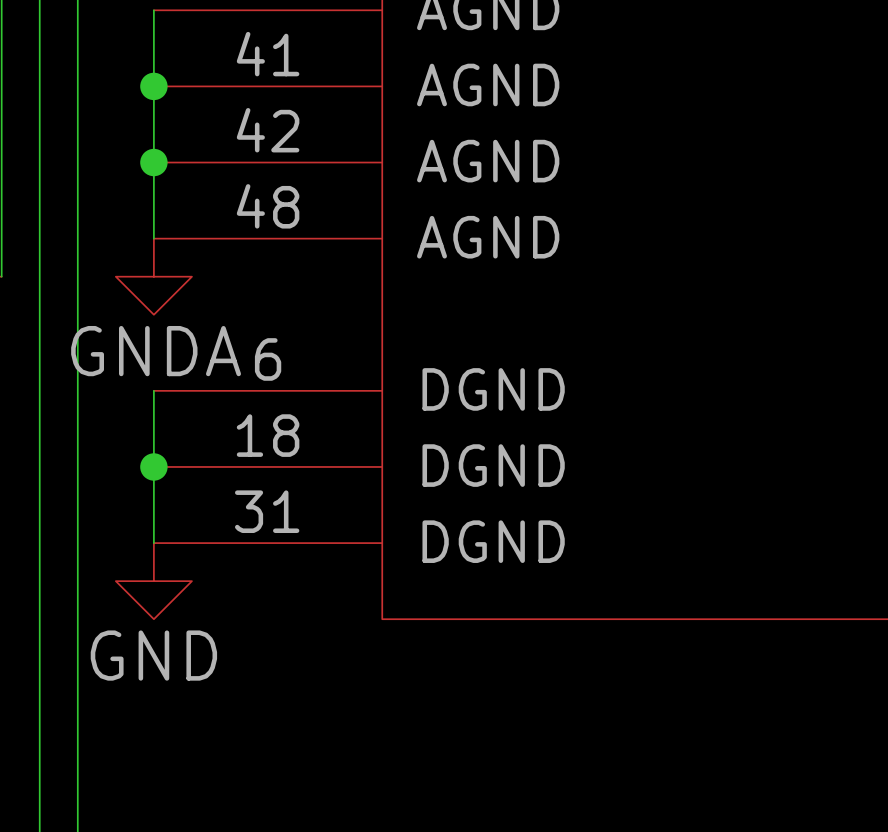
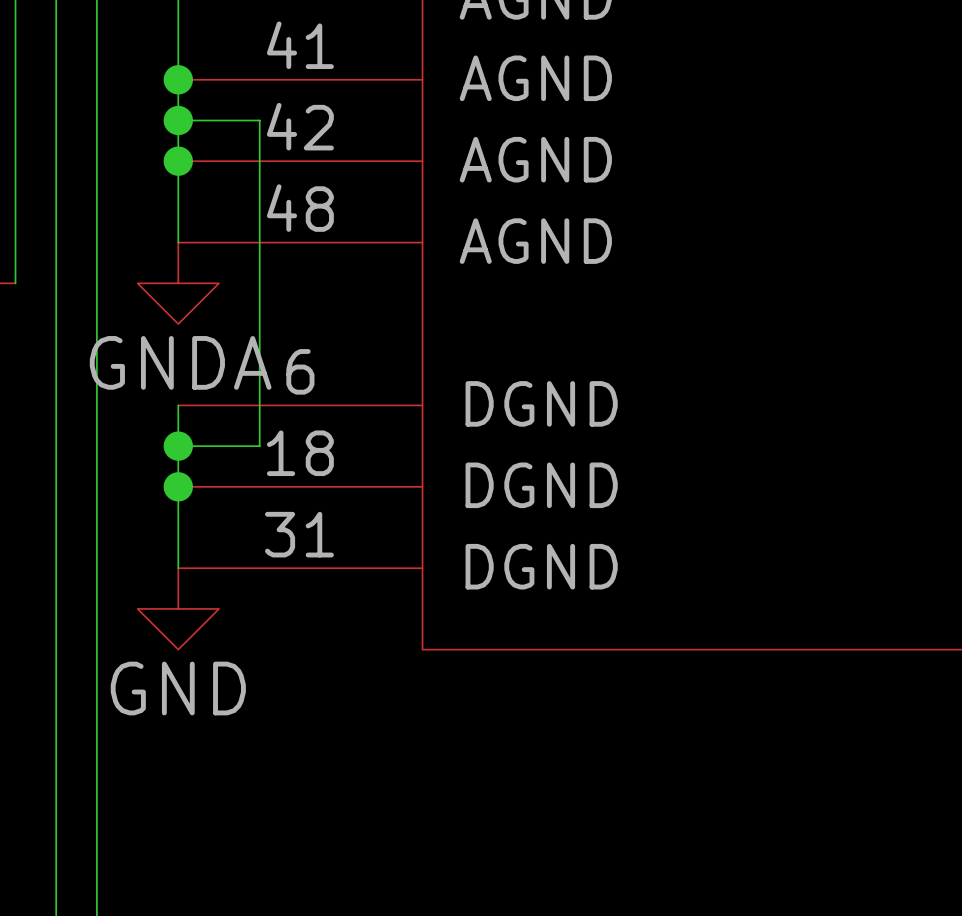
wire: none -> (178, 120) (259, 120) (259, 446) (178, 446)
junction: none -> (178, 120)
junction: none -> (178, 446)

